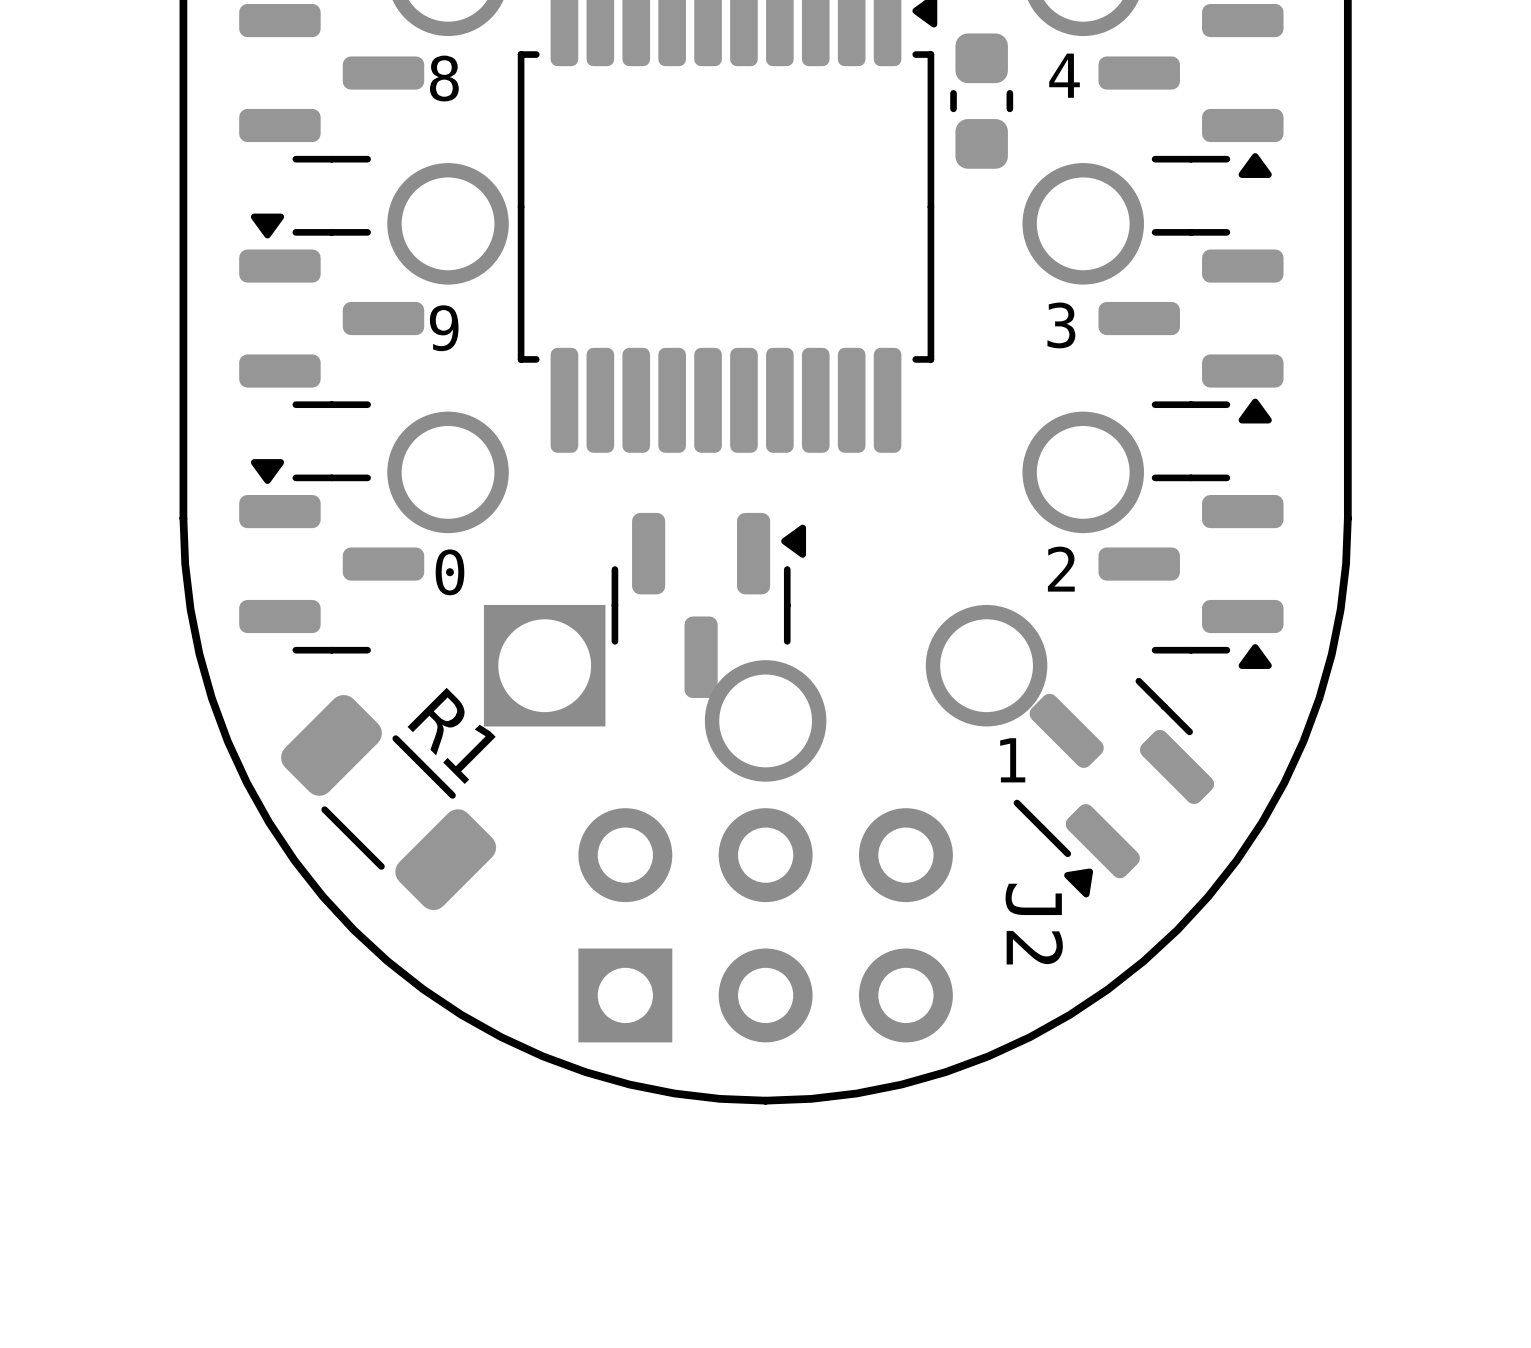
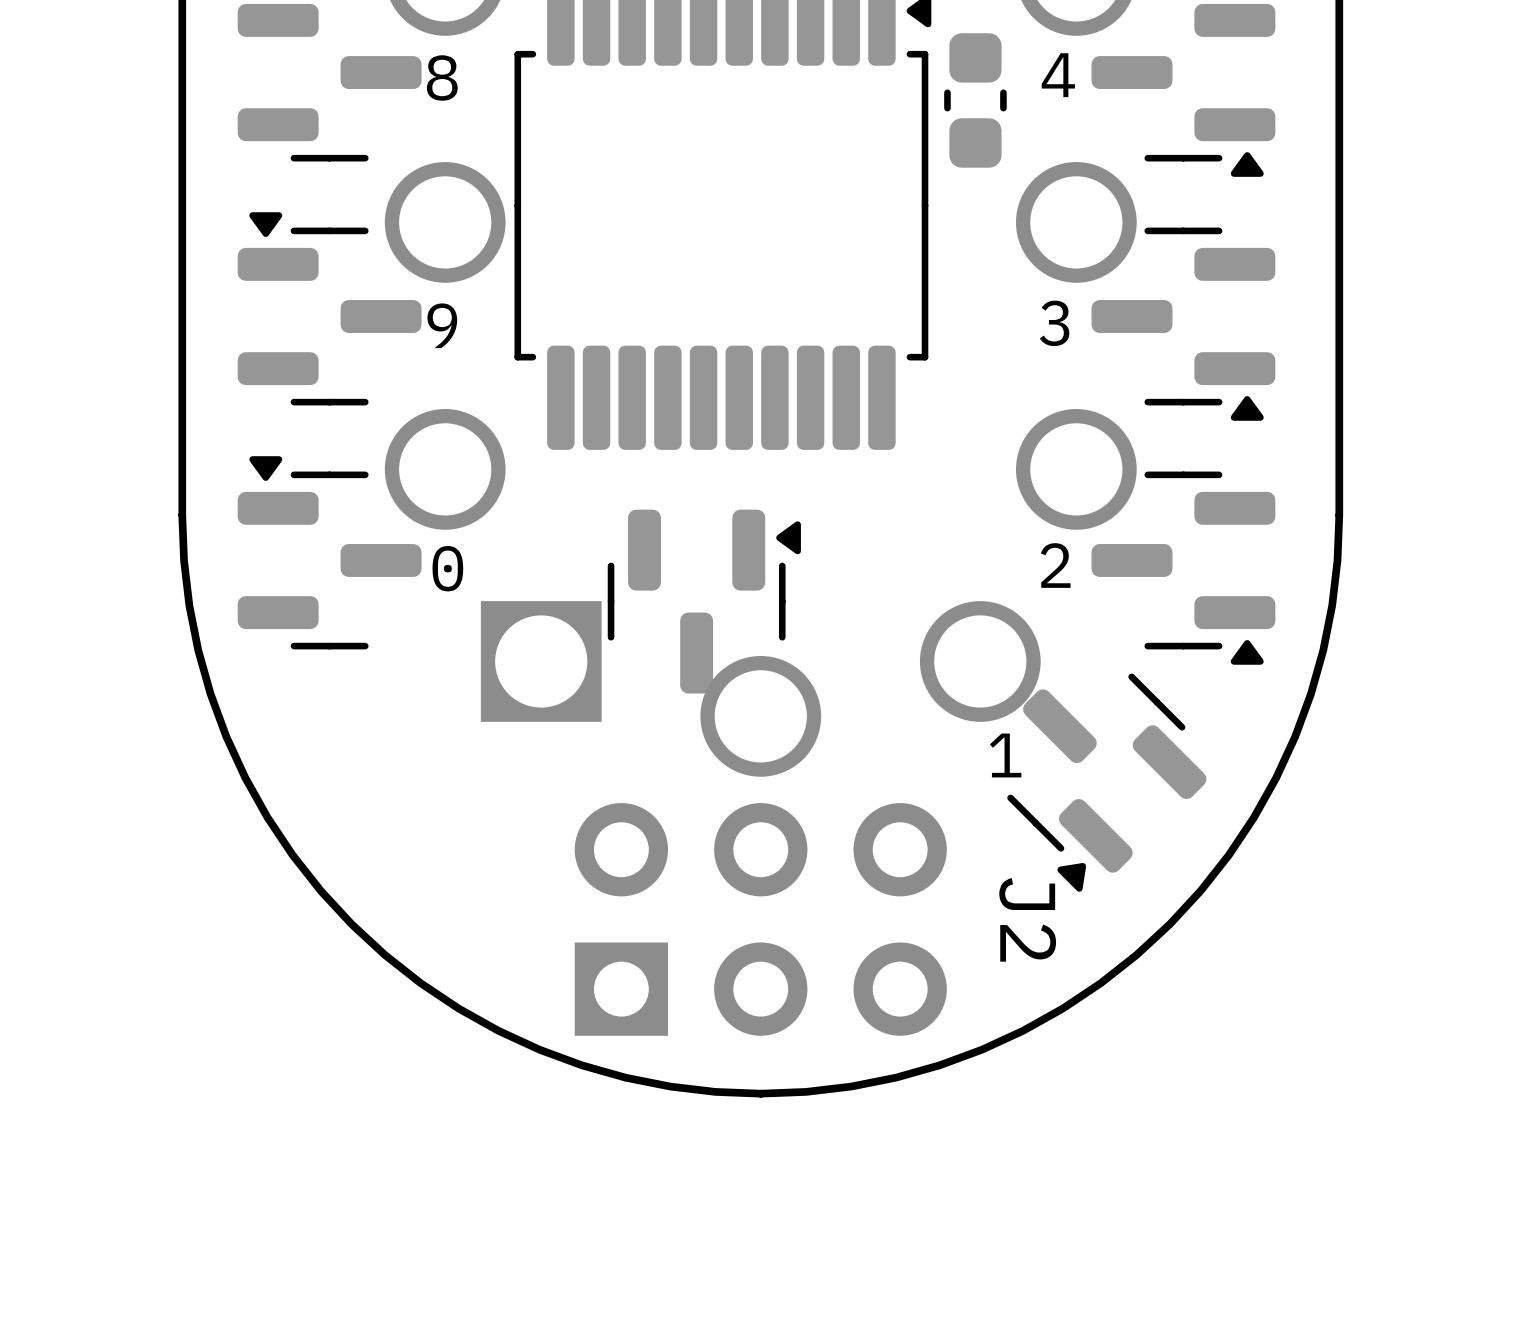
R1: (388, 802) -> none

